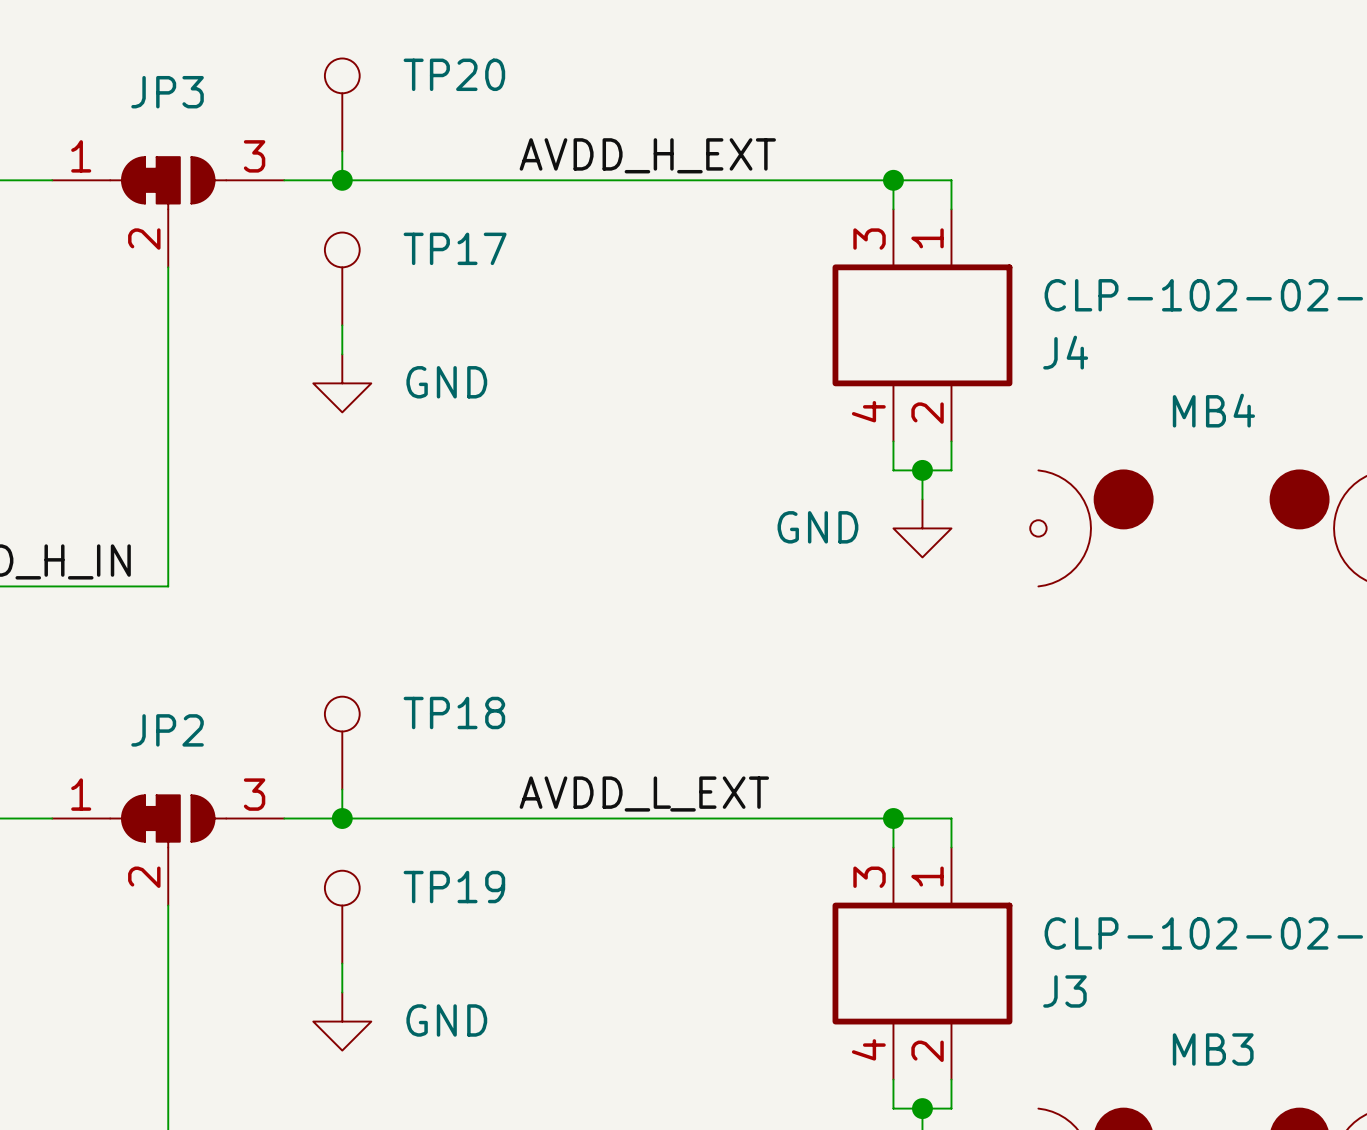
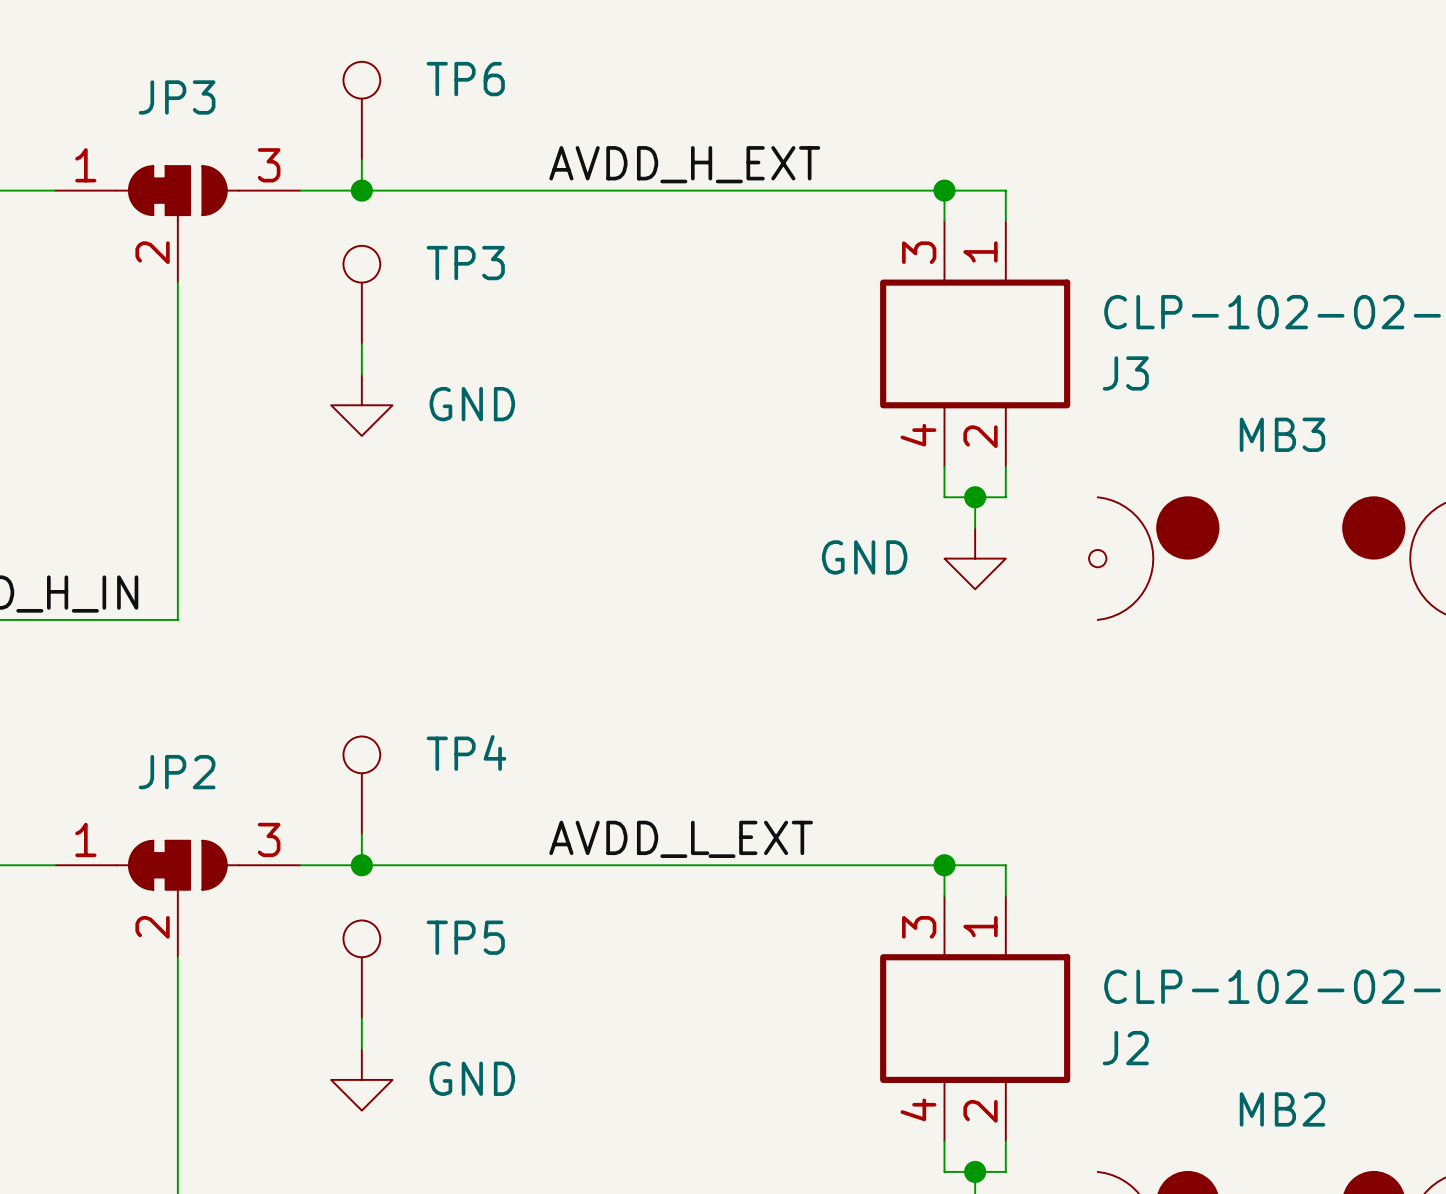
TP20 name: TP20 (454, 74) -> TP6 (465, 79)
TP17 name: TP17 (455, 248) -> TP3 (465, 263)
J4 name: J4 (1065, 352) -> J3 (1125, 373)
MB4 name: MB4 (1213, 410) -> MB3 (1282, 434)
TP18 name: TP18 (454, 712) -> TP4 (466, 752)
TP19 name: TP19 (454, 887) -> TP5 (465, 937)
J3 name: J3 (1064, 991) -> J2 (1125, 1048)
MB3 name: MB3 (1213, 1049) -> MB2 (1282, 1109)

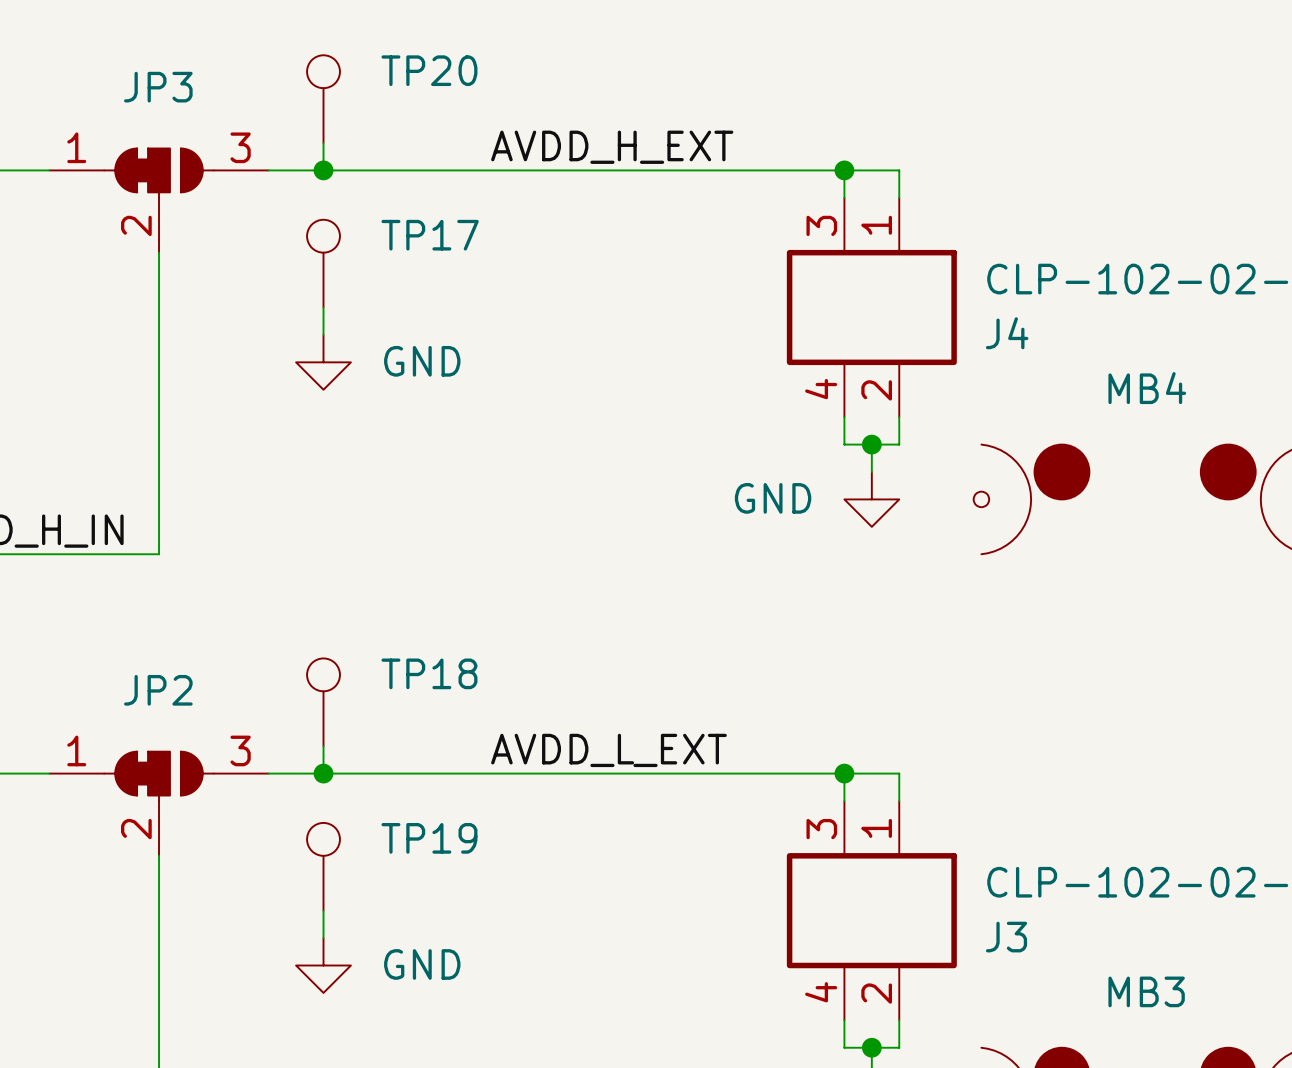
TP6 name: TP6 (465, 79) -> TP20 (429, 70)
TP3 name: TP3 (465, 263) -> TP17 (430, 235)
J3 name: J3 (1125, 373) -> J4 (1007, 333)
MB3 name: MB3 (1282, 434) -> MB4 (1147, 388)
TP4 name: TP4 (466, 752) -> TP18 (429, 673)
TP5 name: TP5 (465, 937) -> TP19 (429, 838)
J2 name: J2 (1125, 1048) -> J3 (1006, 937)
MB2 name: MB2 (1282, 1109) -> MB3 (1146, 991)

